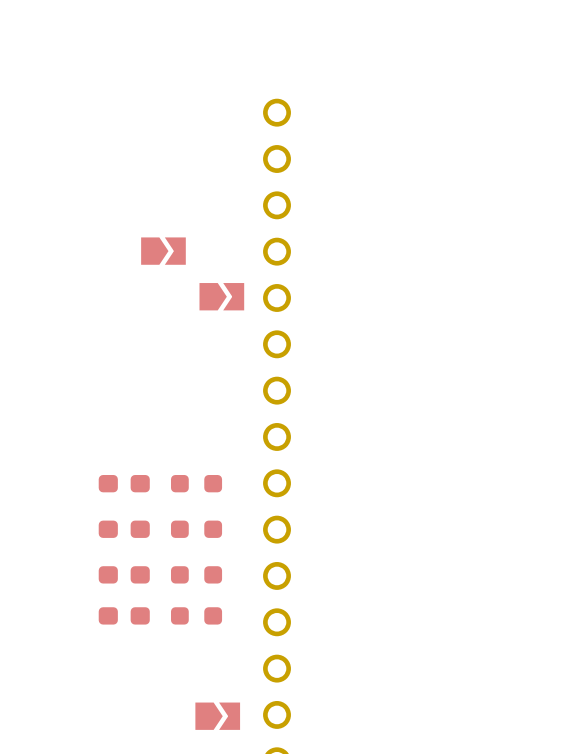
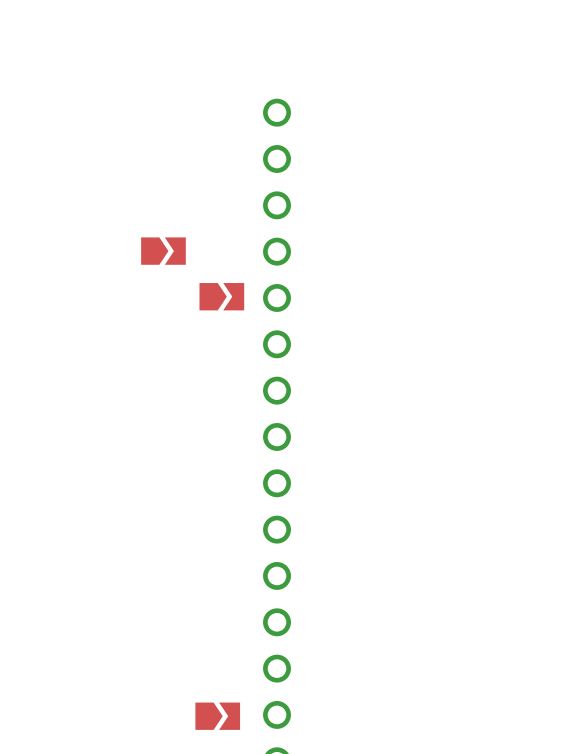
part: (124, 483) -> none
part: (196, 483) -> none
part: (124, 529) -> none
part: (196, 529) -> none
part: (124, 574) -> none
part: (196, 574) -> none
part: (124, 615) -> none
part: (196, 615) -> none

